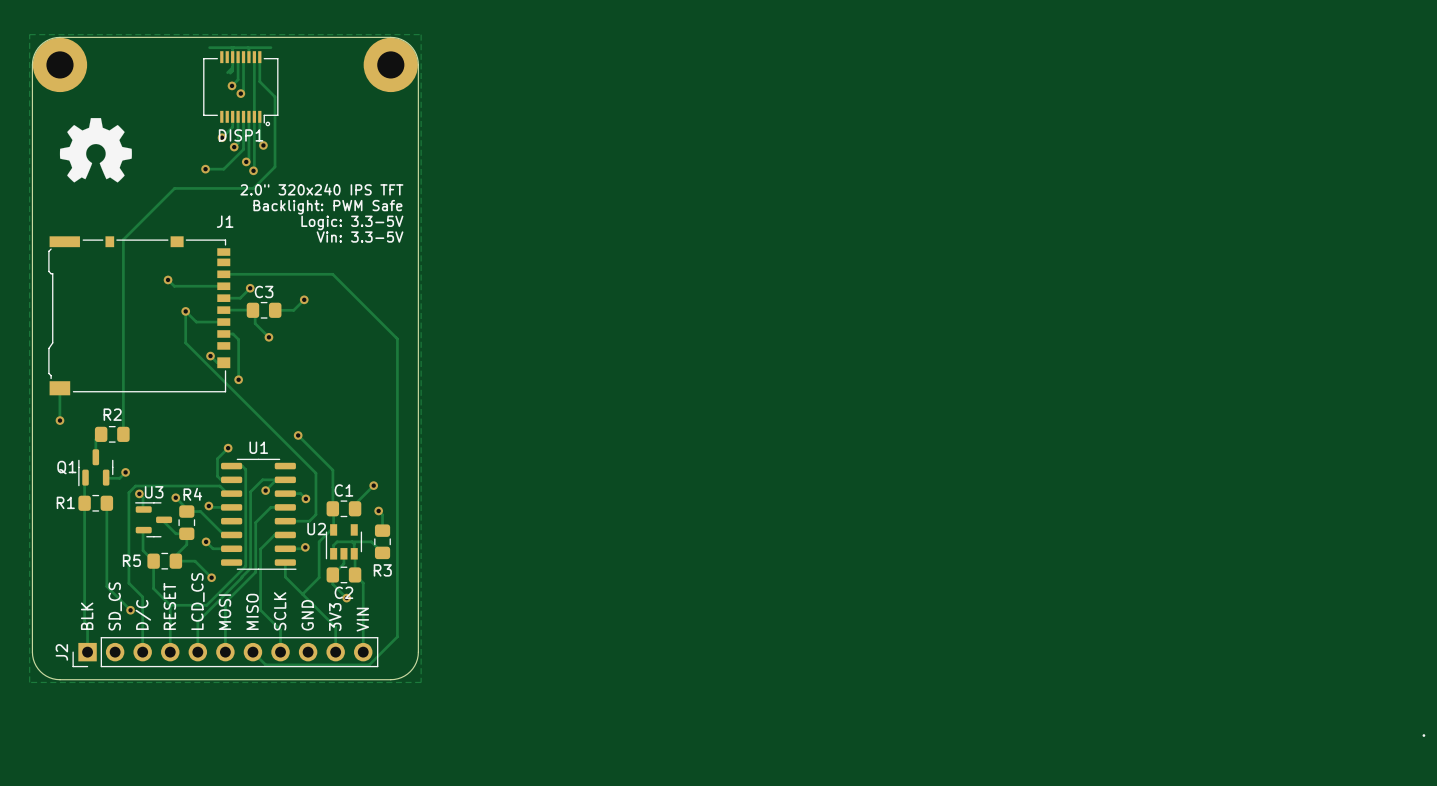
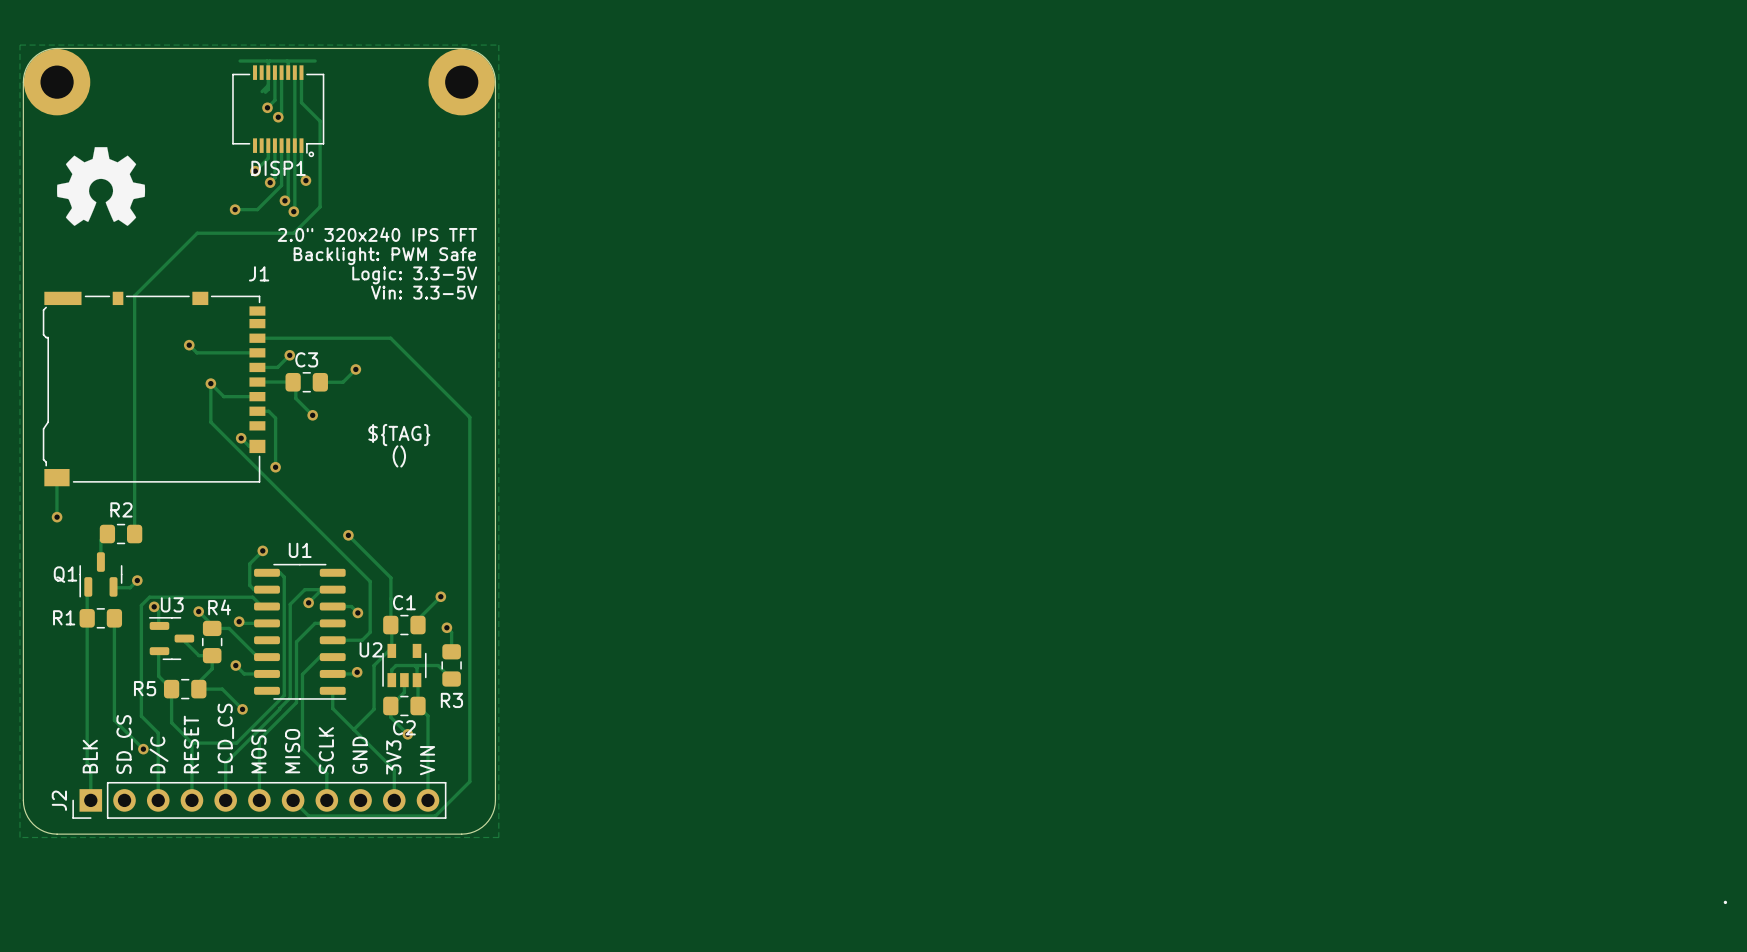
text: none -> ${TAG} (399, 435)
text: none -> () (399, 456)

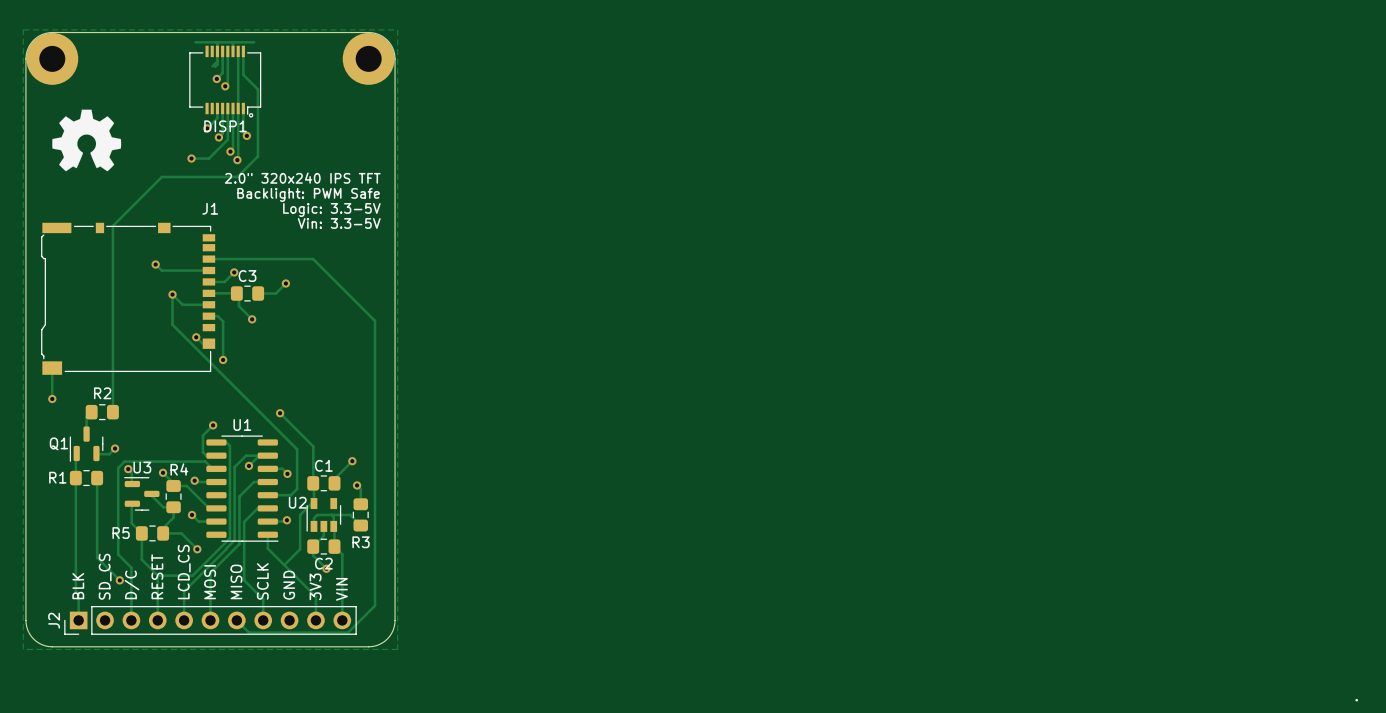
text: ${TAG} (399, 435) -> none
text: () (399, 456) -> none

